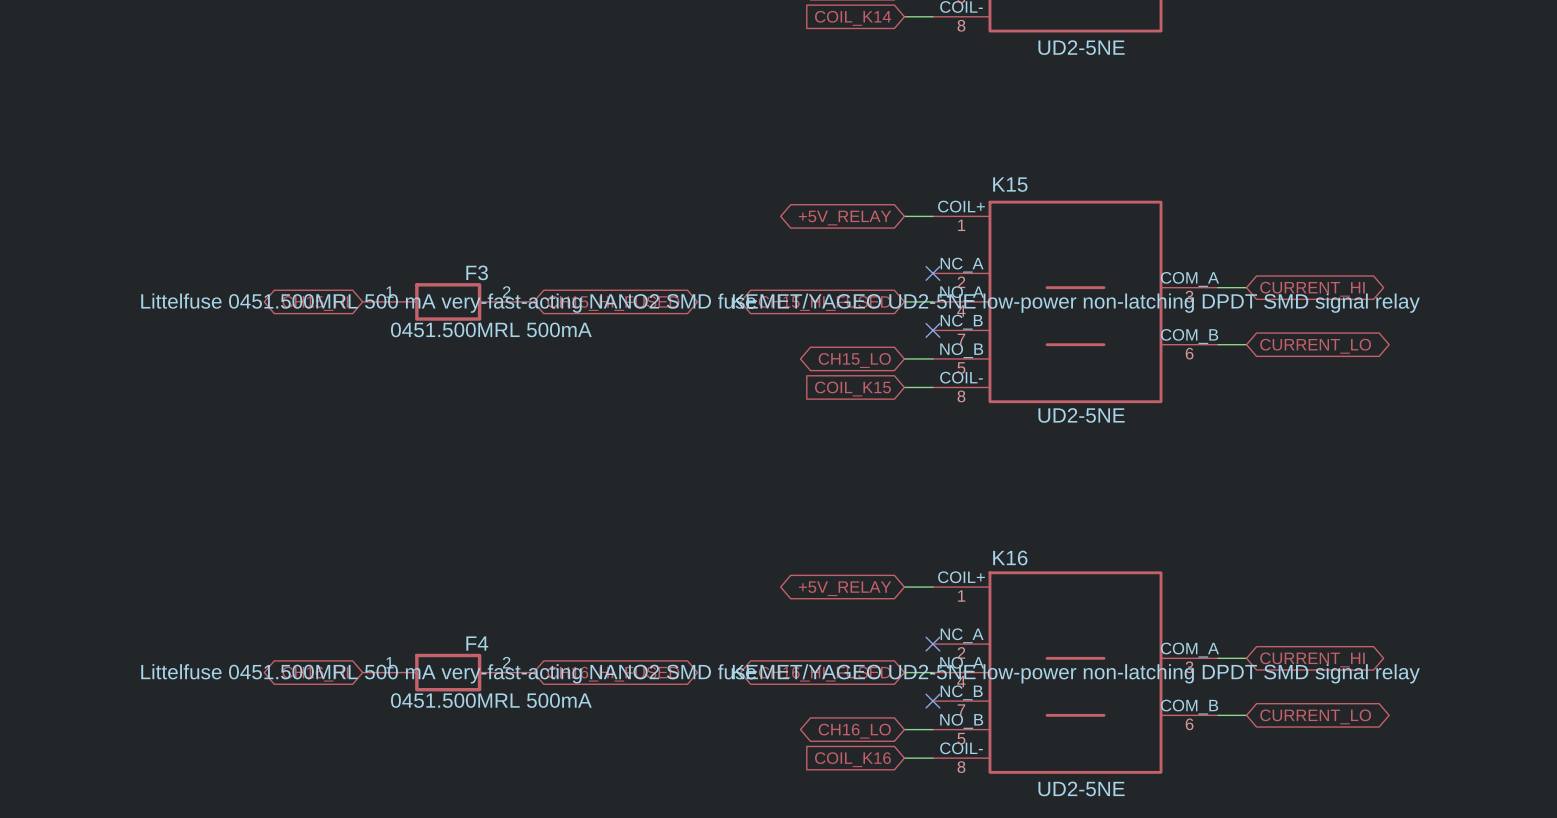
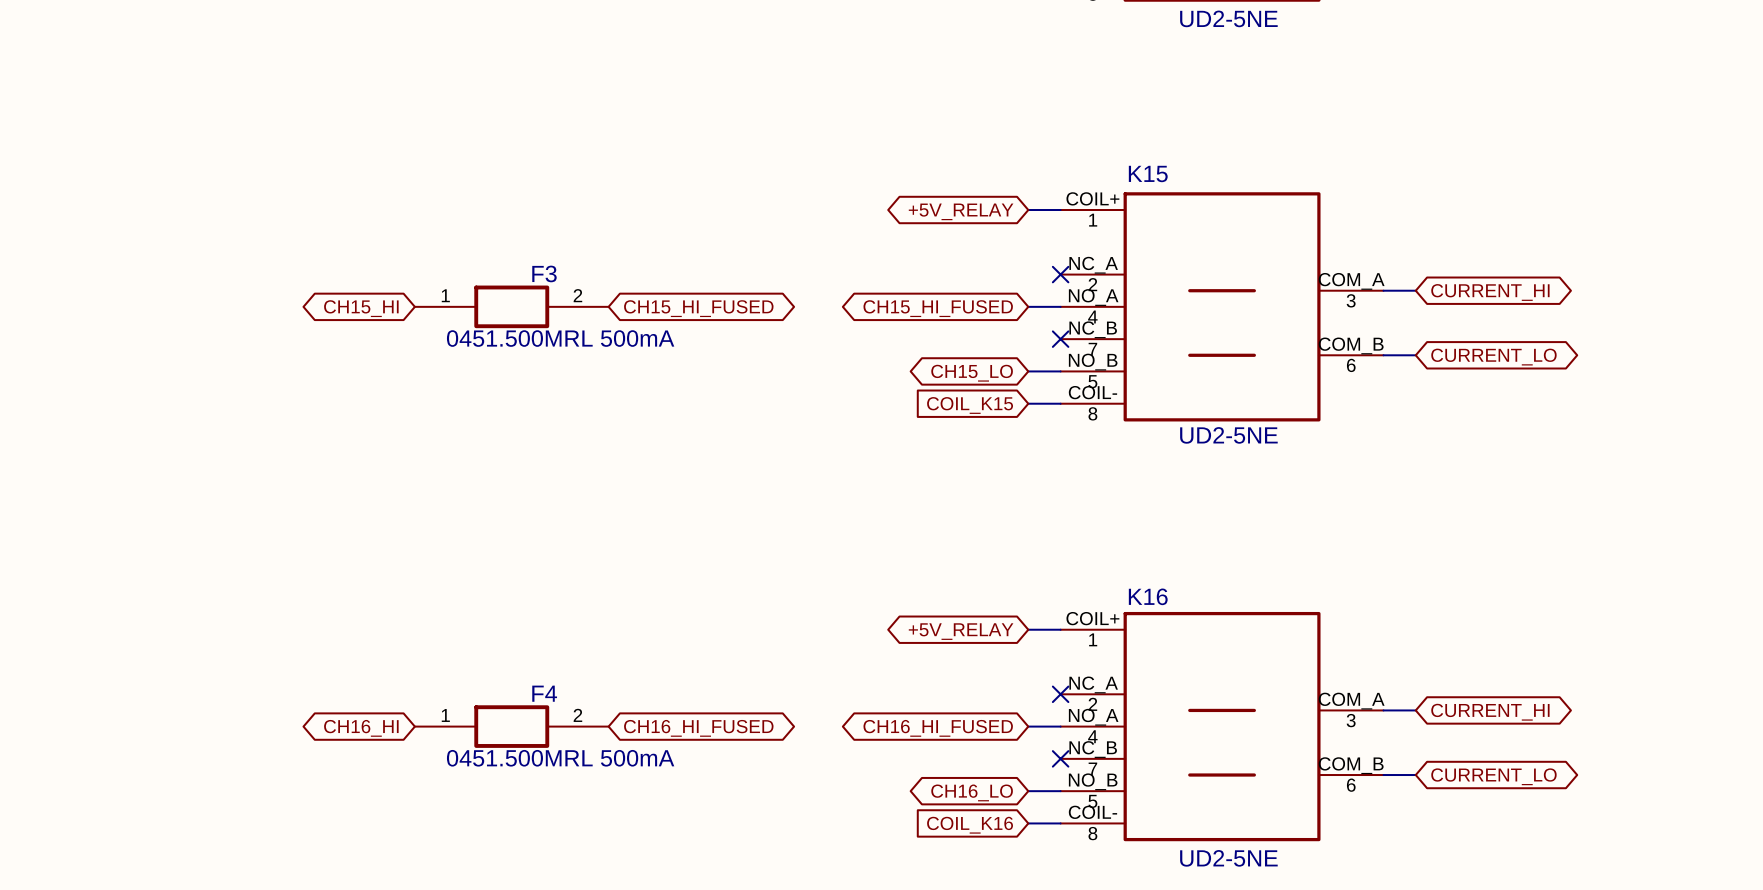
F3 text: Littelfuse 0451.500MRL 500 mA very-fast-acting NANO2 SMD fuse (448, 303) -> none
K15 text: KEMET/YAGEO UD2-5NE low-power non-latching DPDT SMD signal relay (1076, 303) -> none
F4 text: Littelfuse 0451.500MRL 500 mA very-fast-acting NANO2 SMD fuse (448, 673) -> none
K16 text: KEMET/YAGEO UD2-5NE low-power non-latching DPDT SMD signal relay (1076, 673) -> none

